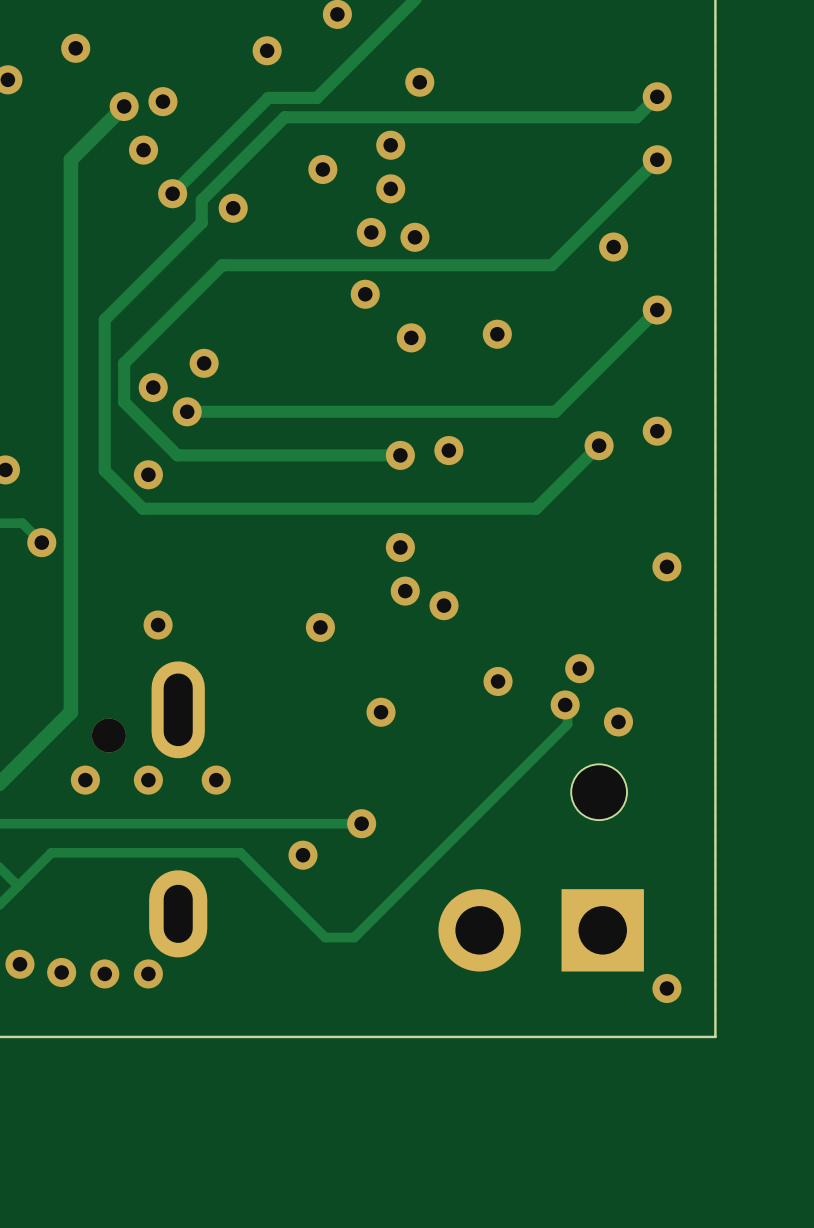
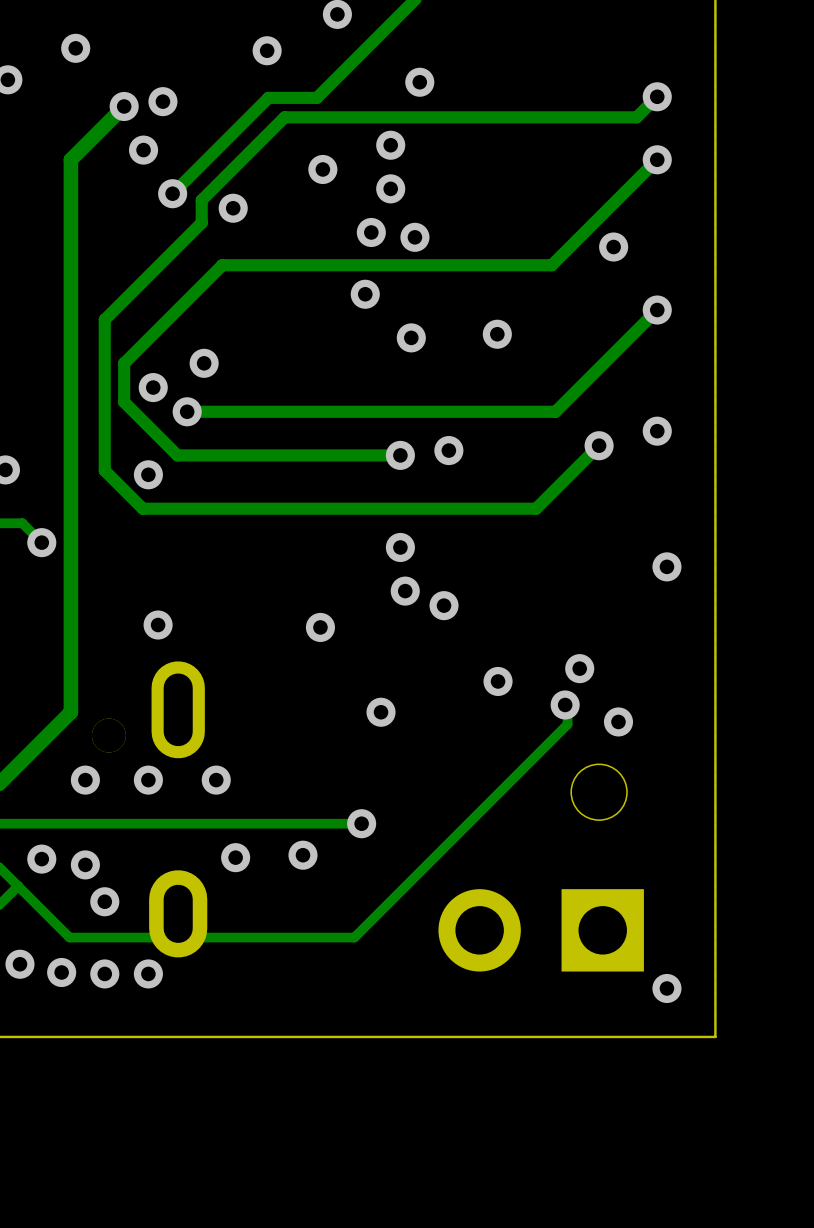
via: none -> (235, 857)
via: none -> (41, 859)
via: none -> (85, 864)
track: (18, 886) (51, 852) (240, 852) (325, 937) -> (18, 886) (69, 937) (325, 937)
via: none -> (104, 901)

